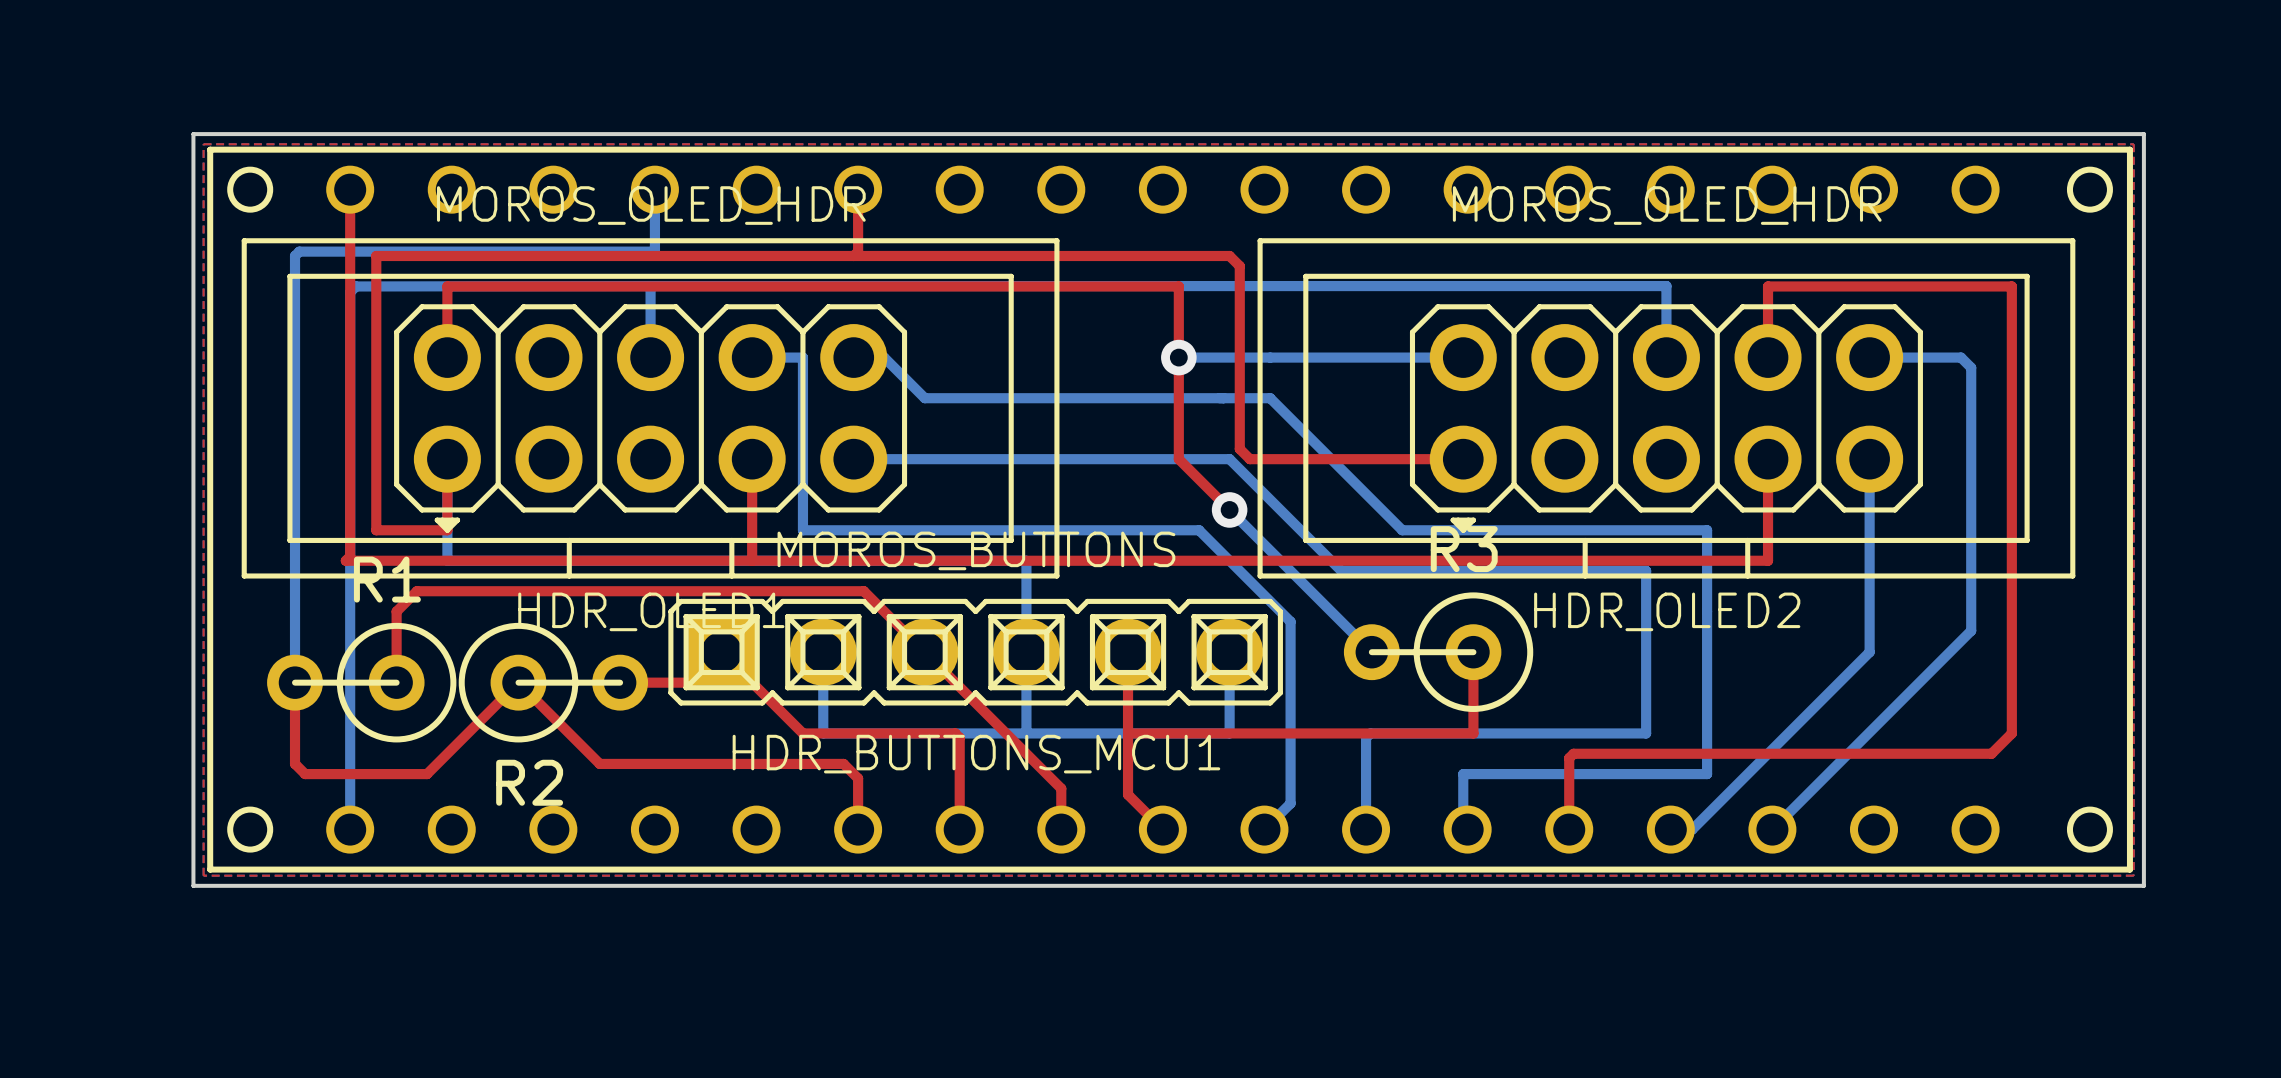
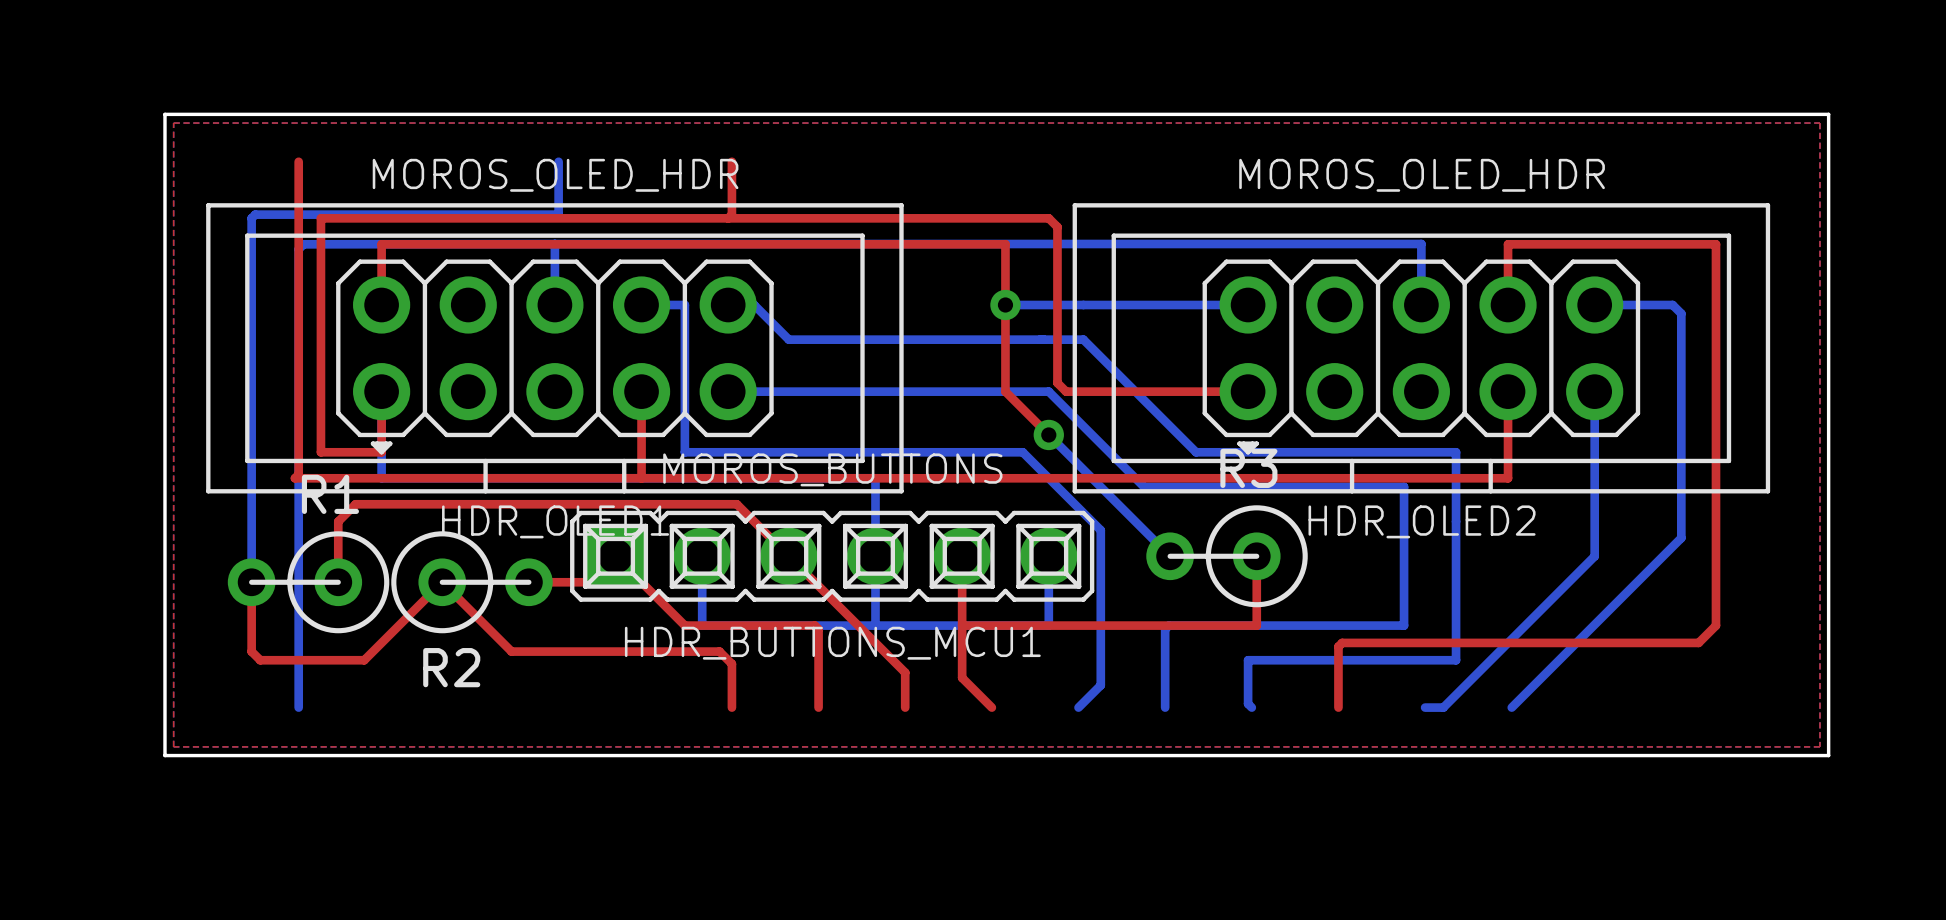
part: (1170, 509) -> none

